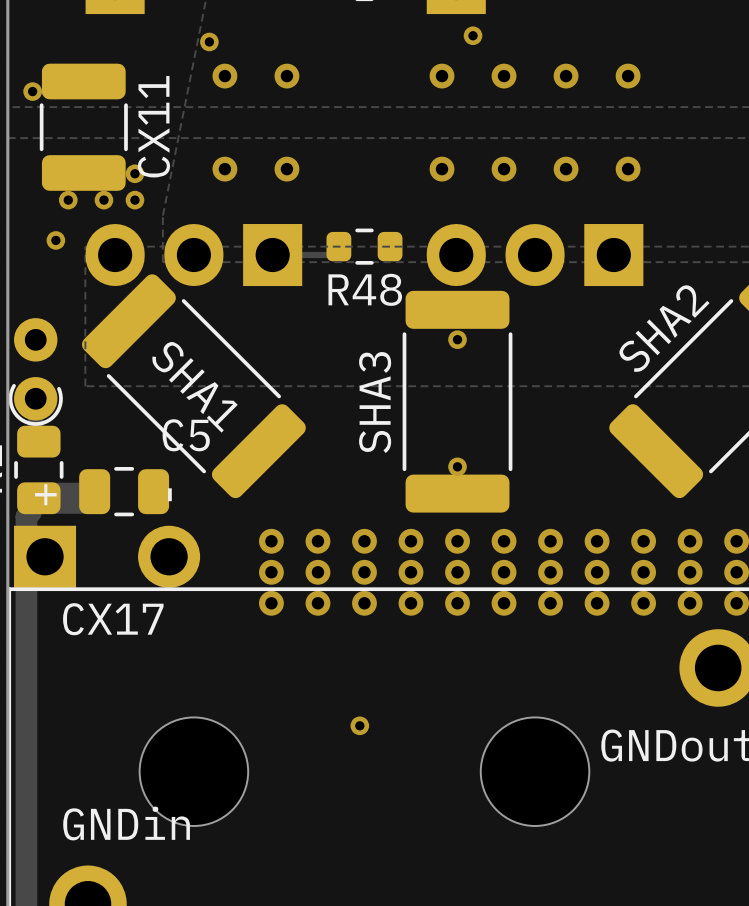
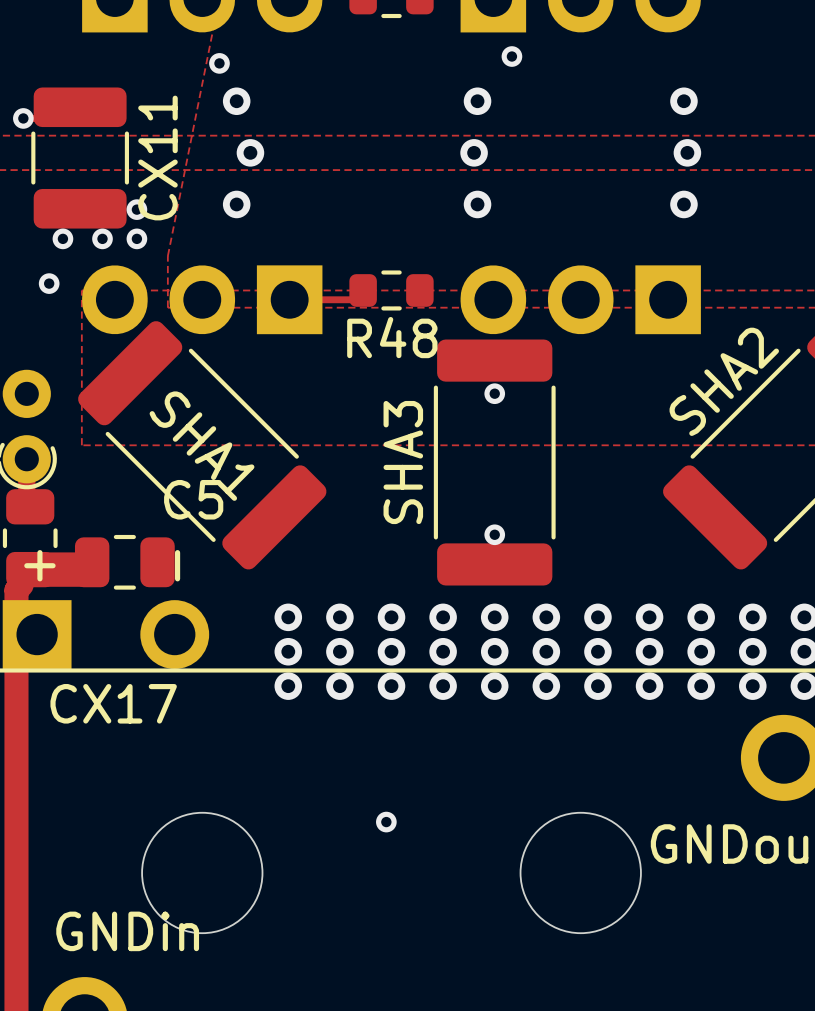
via: (286, 76) -> none
via: (504, 76) -> none
via: (566, 76) -> none
via: none -> (250, 152)
via: none -> (474, 152)
via: none -> (687, 152)
via: (286, 169) -> none
via: (504, 169) -> none
via: (566, 169) -> none

